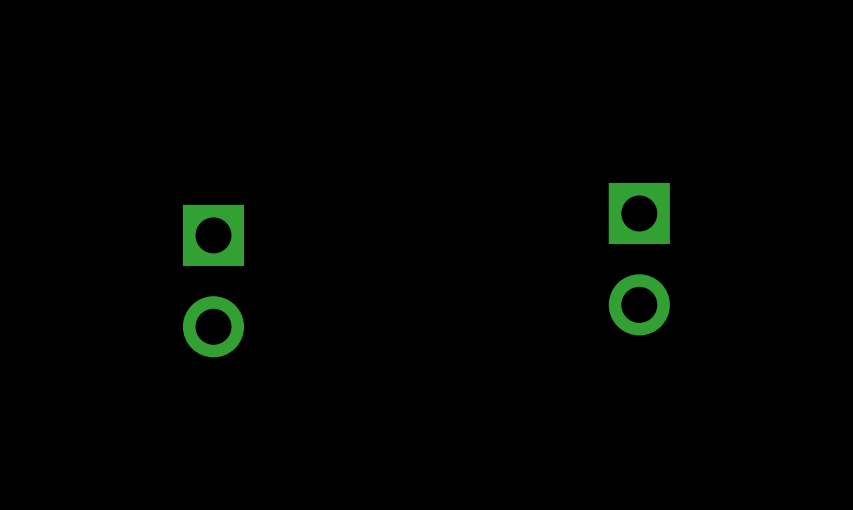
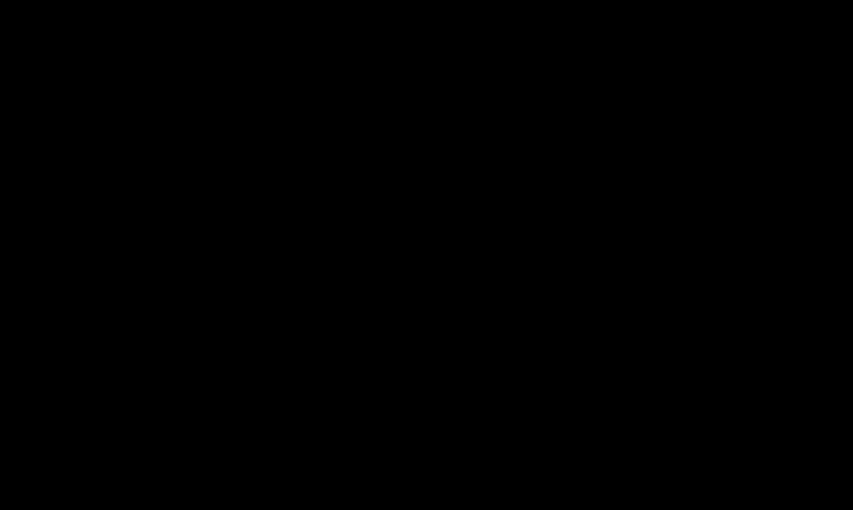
part: (639, 259) -> none
part: (213, 281) -> none

